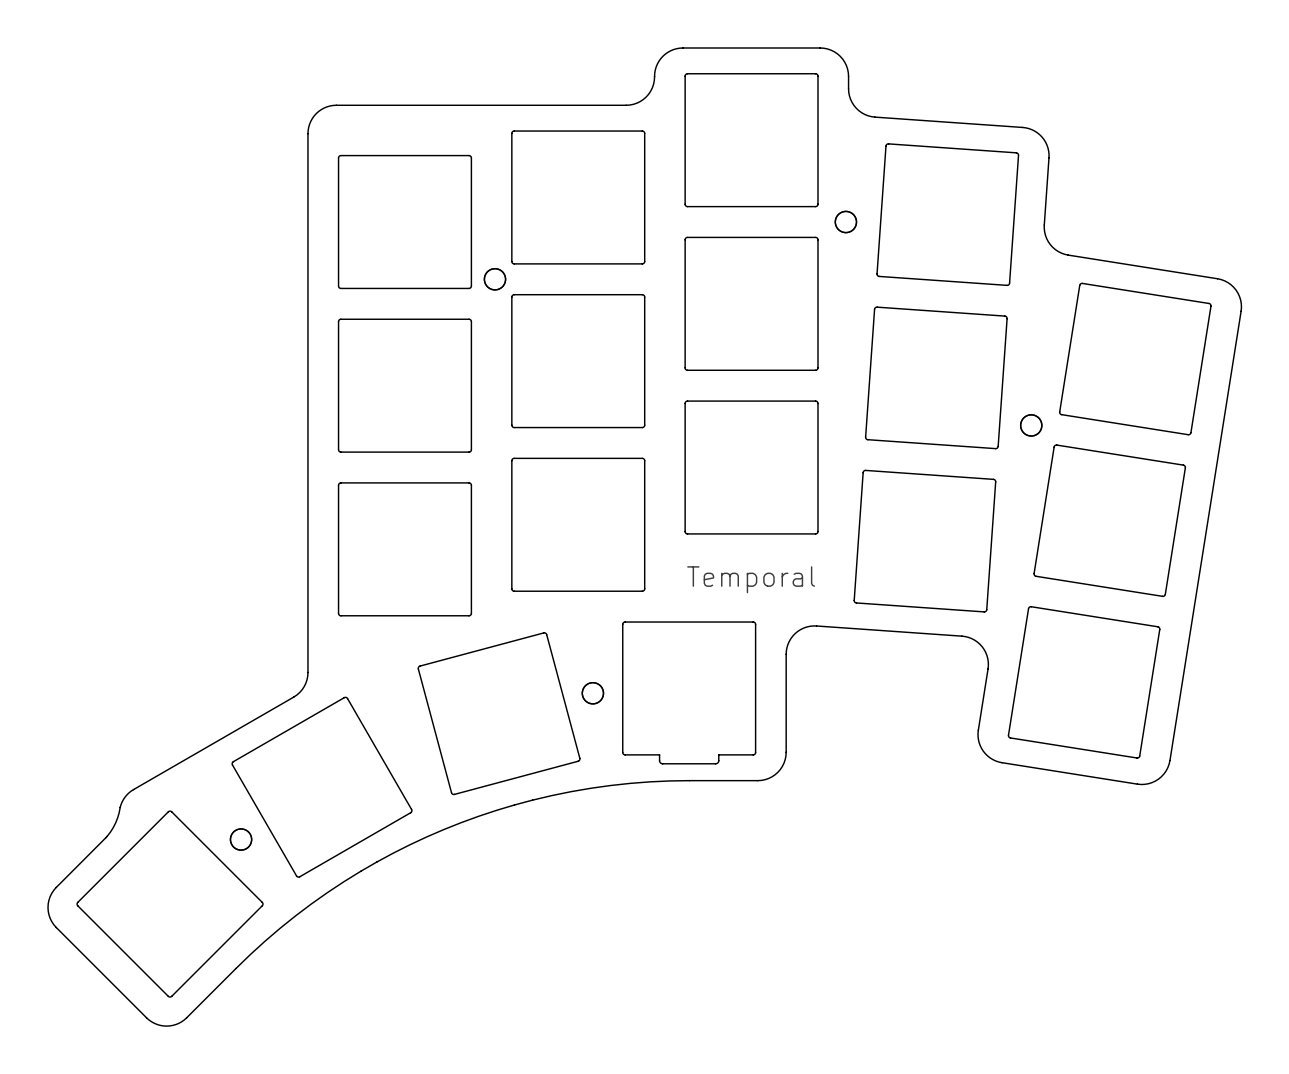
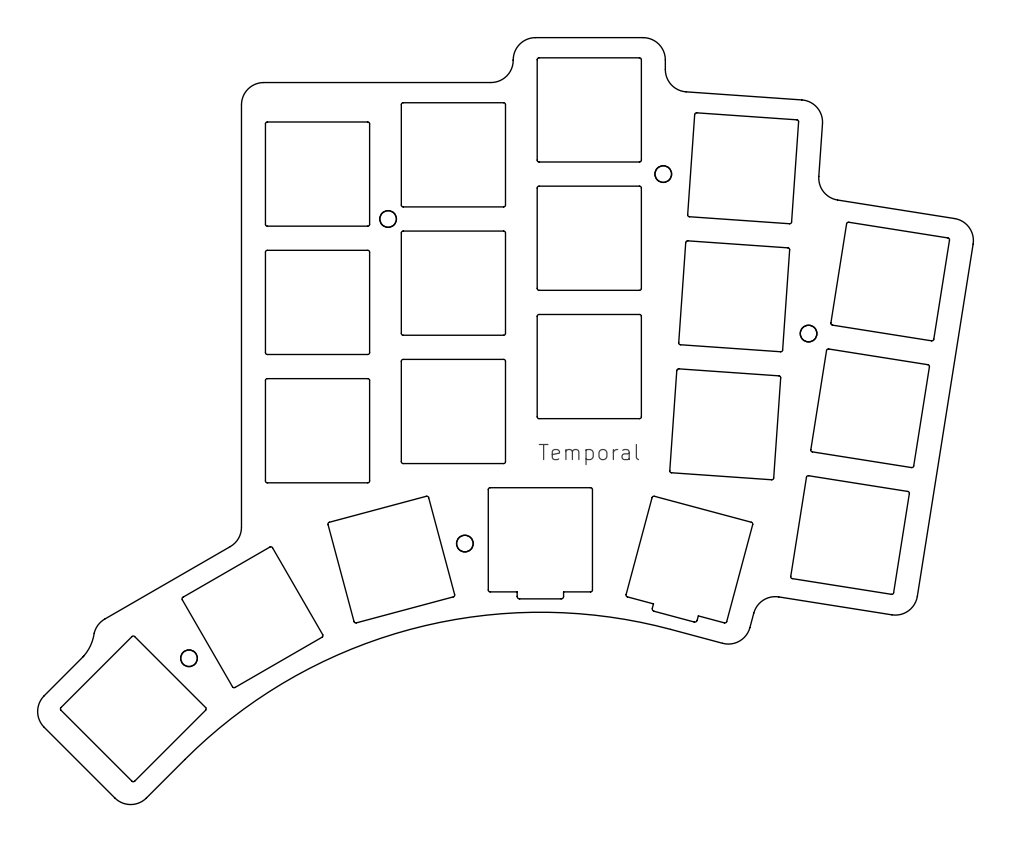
board edge: none -> (654, 496) (752, 523) (725, 622) (698, 615) (694, 622) (654, 611) (652, 609) (653, 603) (626, 596) (652, 497) (654, 496)
board edge: (1001, 762) (992, 759) (985, 753) (978, 739) (988, 665) (985, 652) (977, 642) (961, 636) (816, 625) (806, 627) (792, 635) (786, 647) (785, 755) (782, 766) (771, 776) (757, 780) (669, 780) (610, 785) (551, 795) (478, 816) (410, 844) (343, 881) (279, 928) (235, 968) -> (785, 598) (770, 597) (760, 601) (754, 610) (746, 635) (739, 641) (731, 643) (625, 619) (563, 612) (486, 615) (410, 629) (351, 649) (295, 675) (243, 709) (184, 759)

